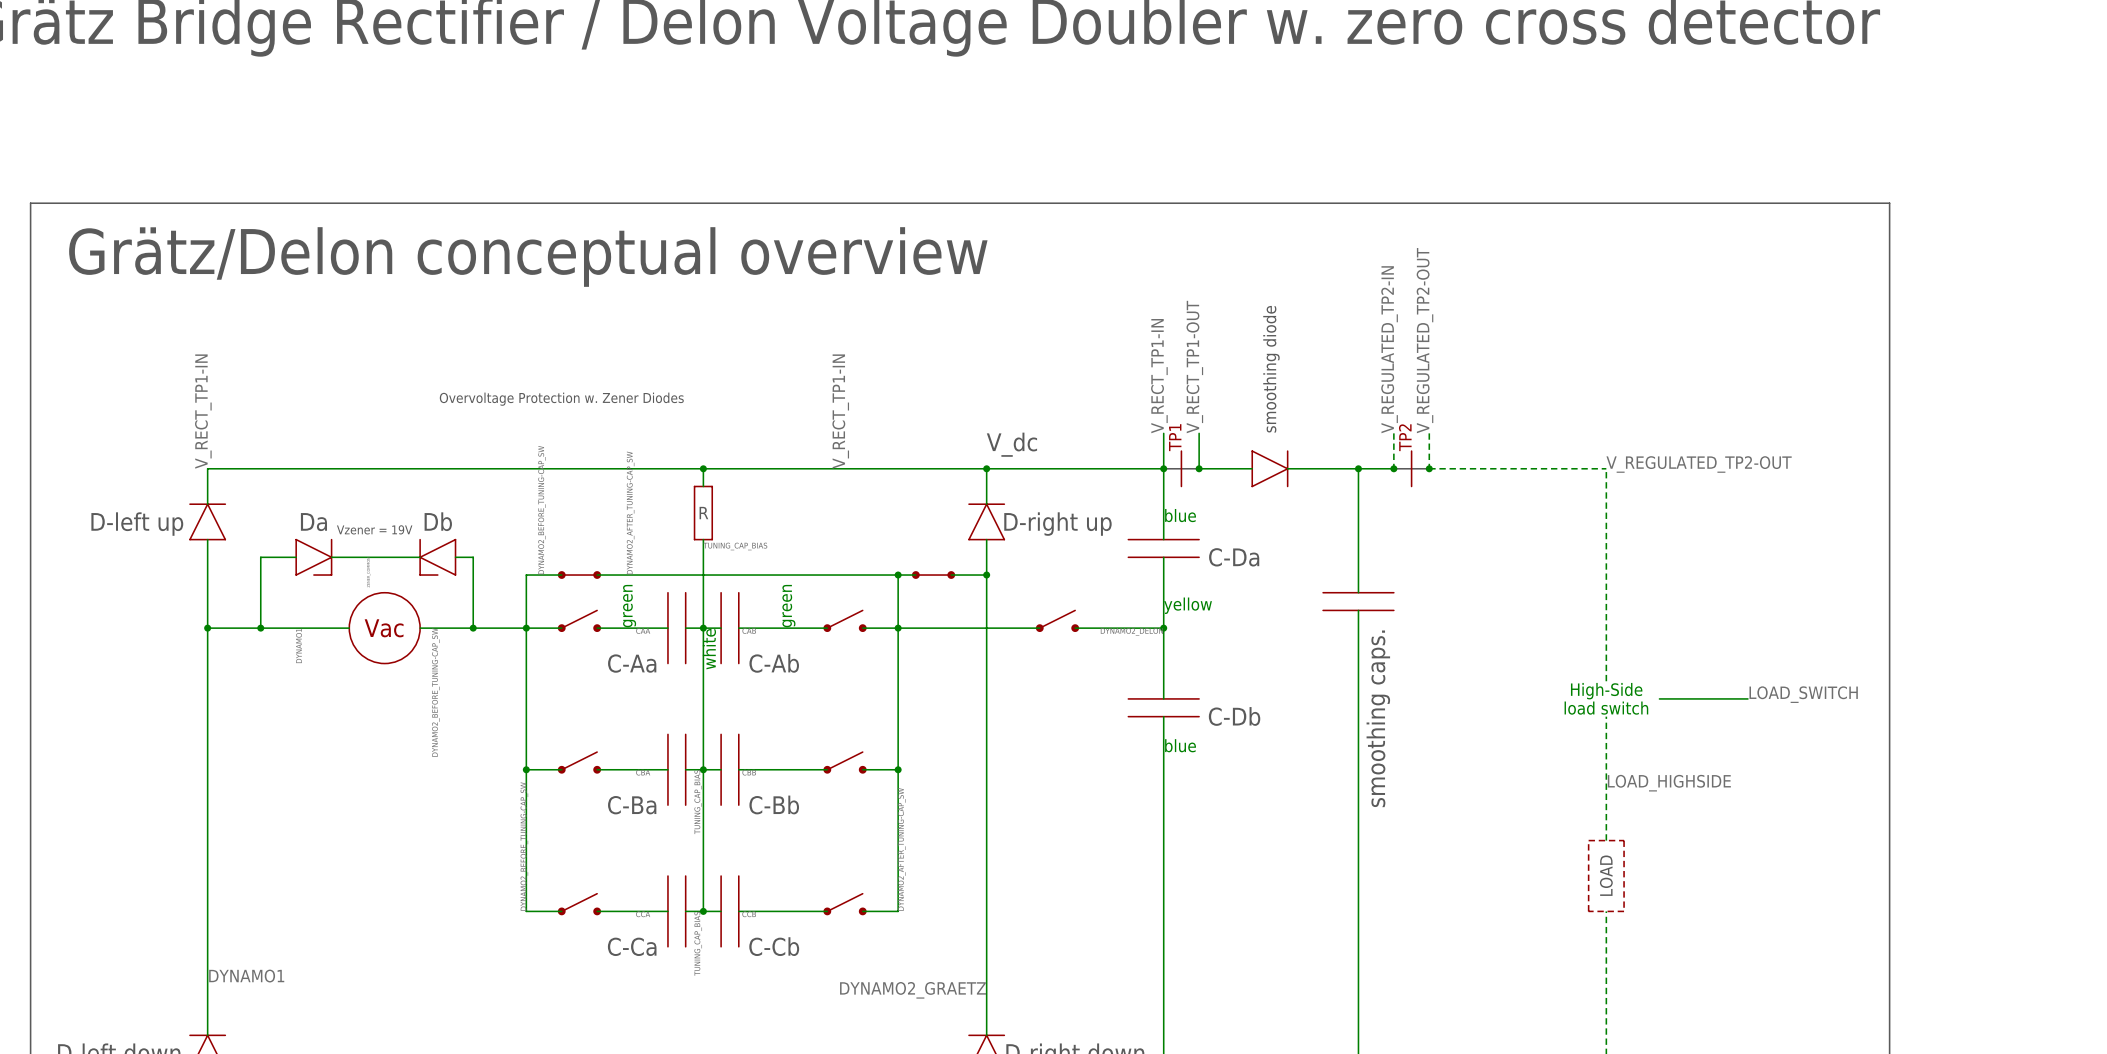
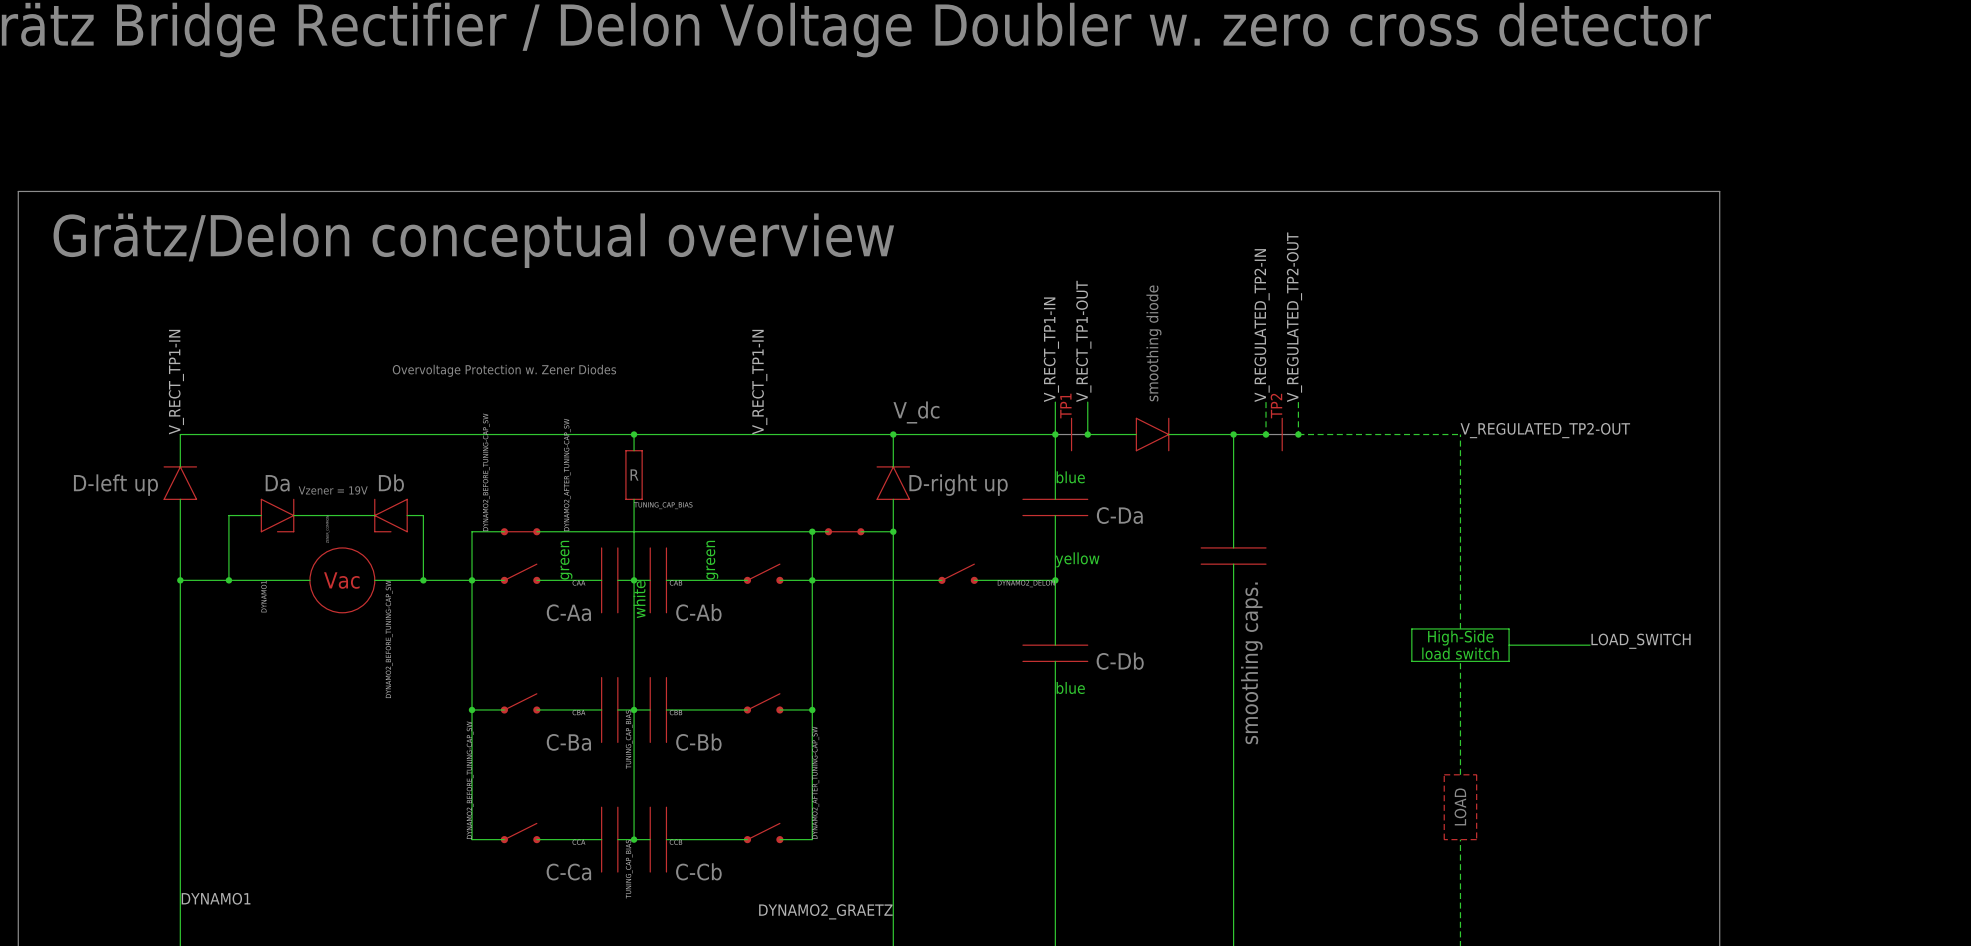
wire: none -> (1411, 628) (1509, 628) (1509, 661) (1411, 661) (1411, 628)
label: LOAD_HIGHSIDE (1669, 783) -> none

